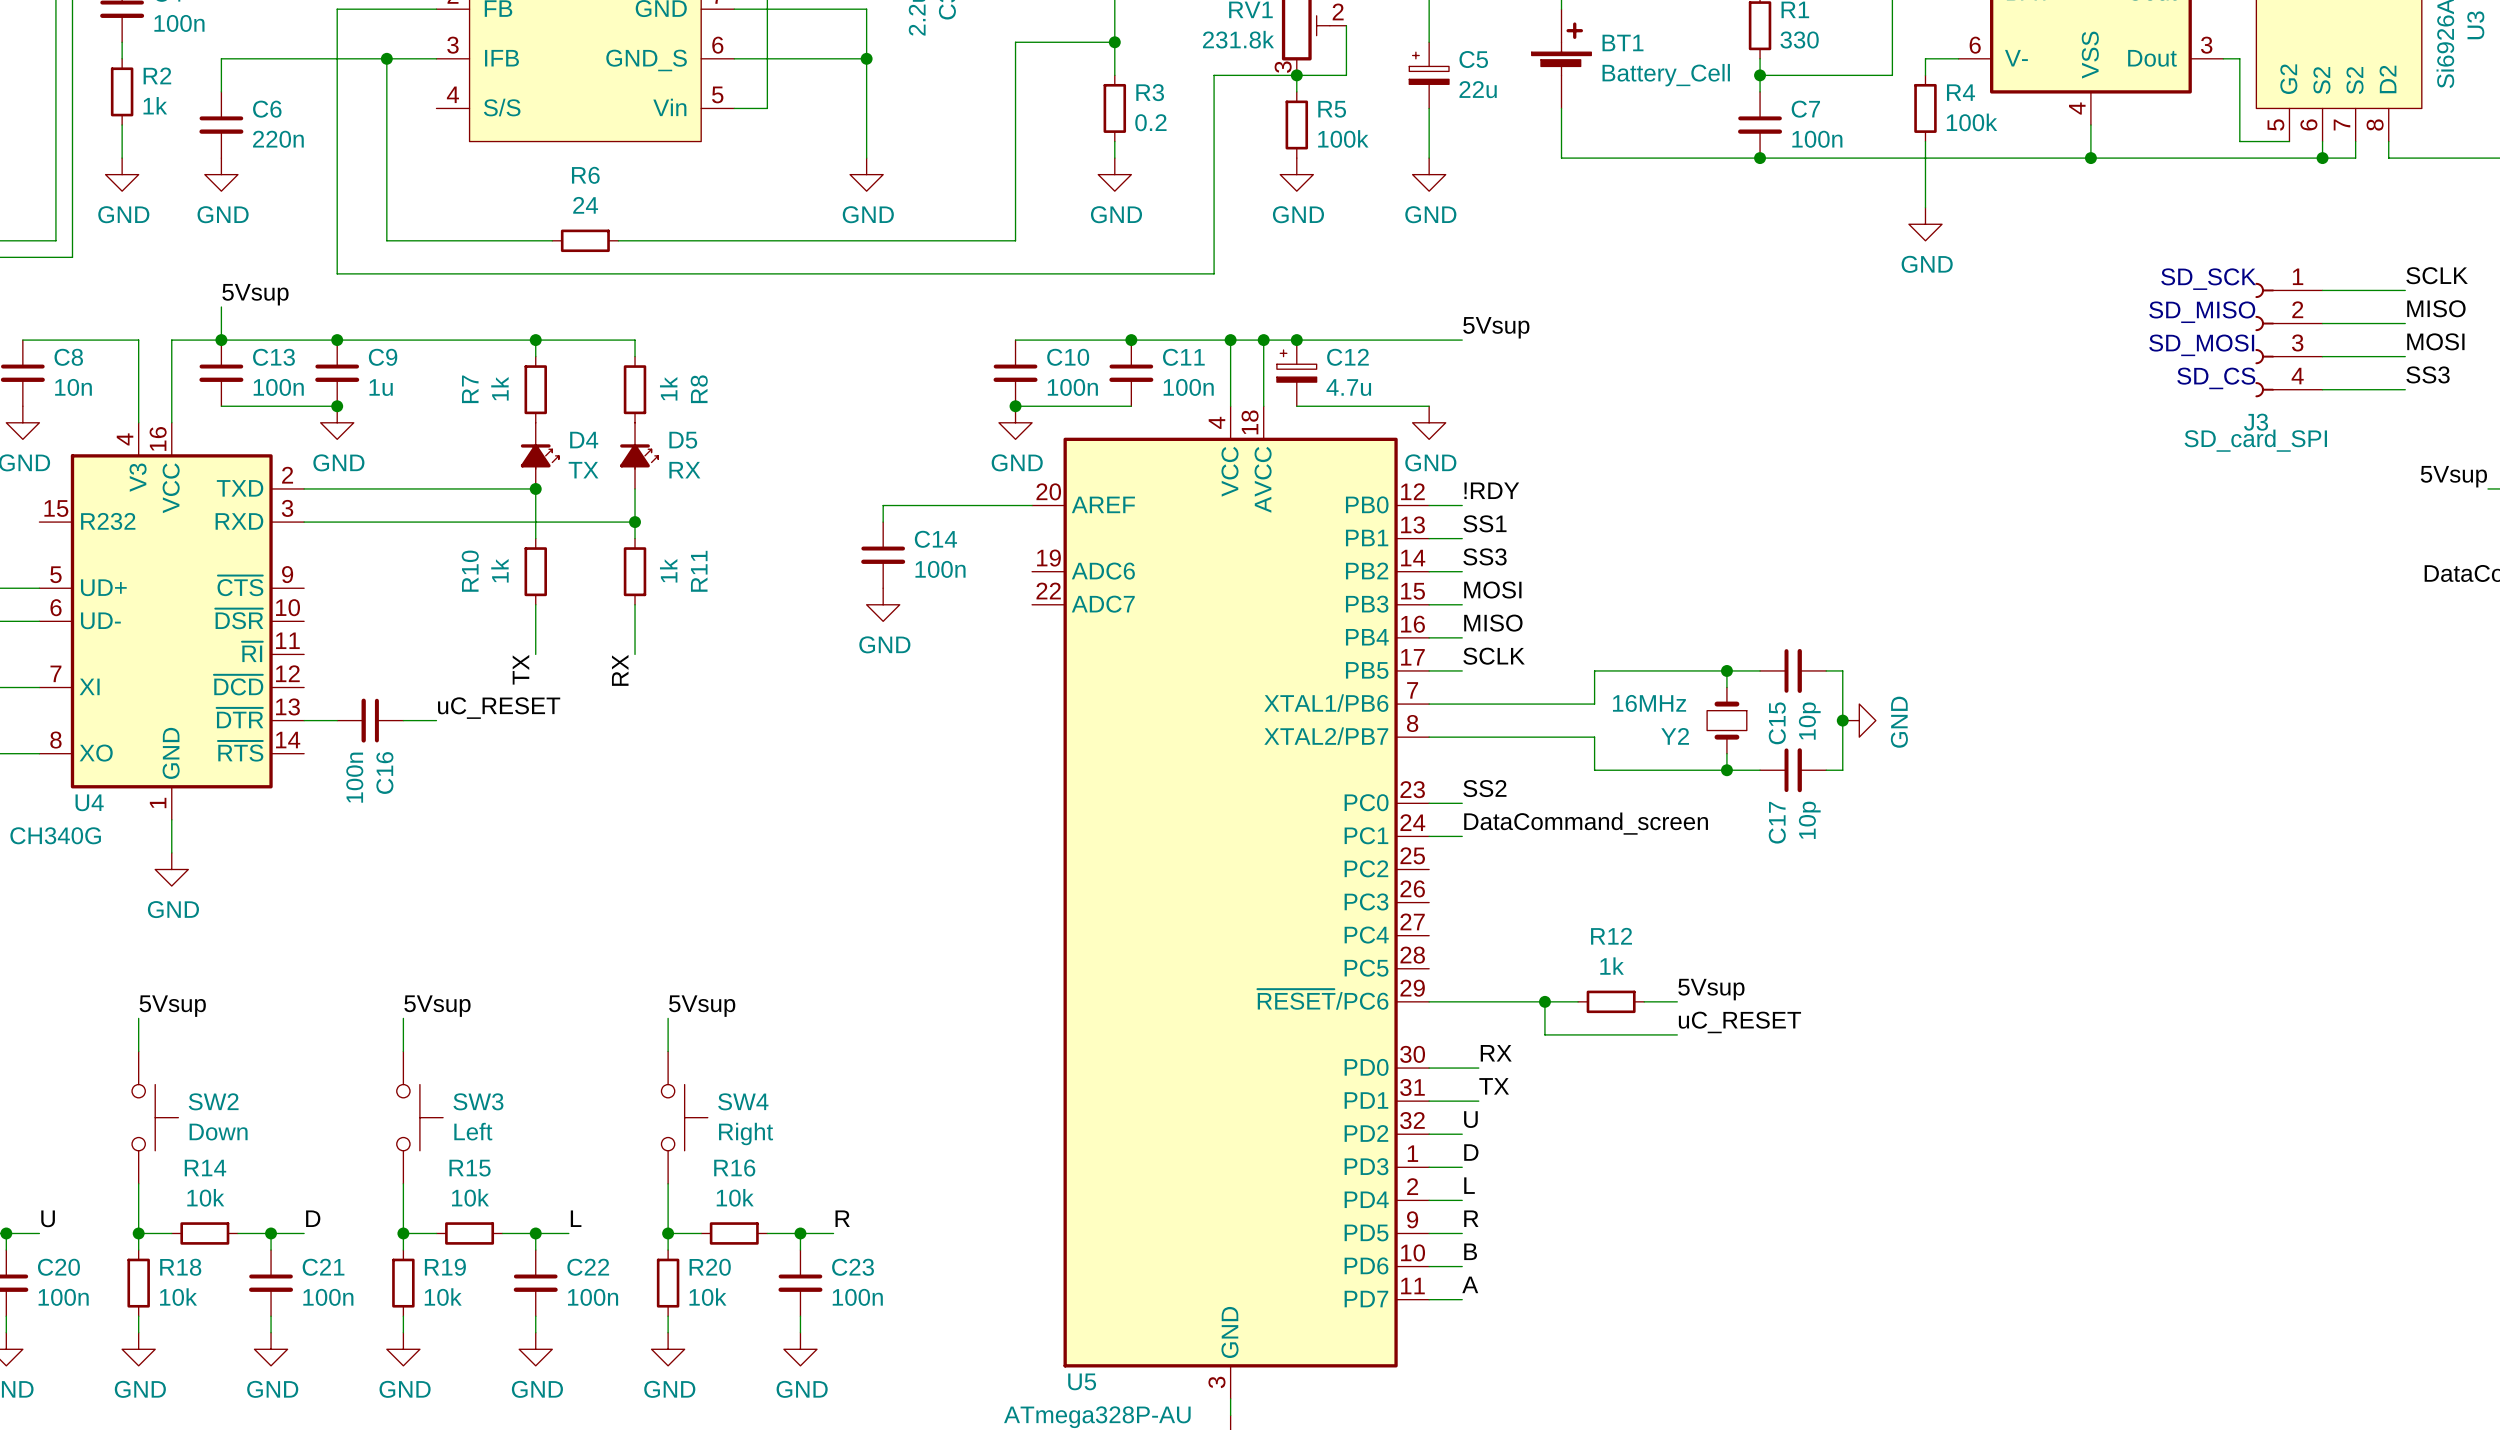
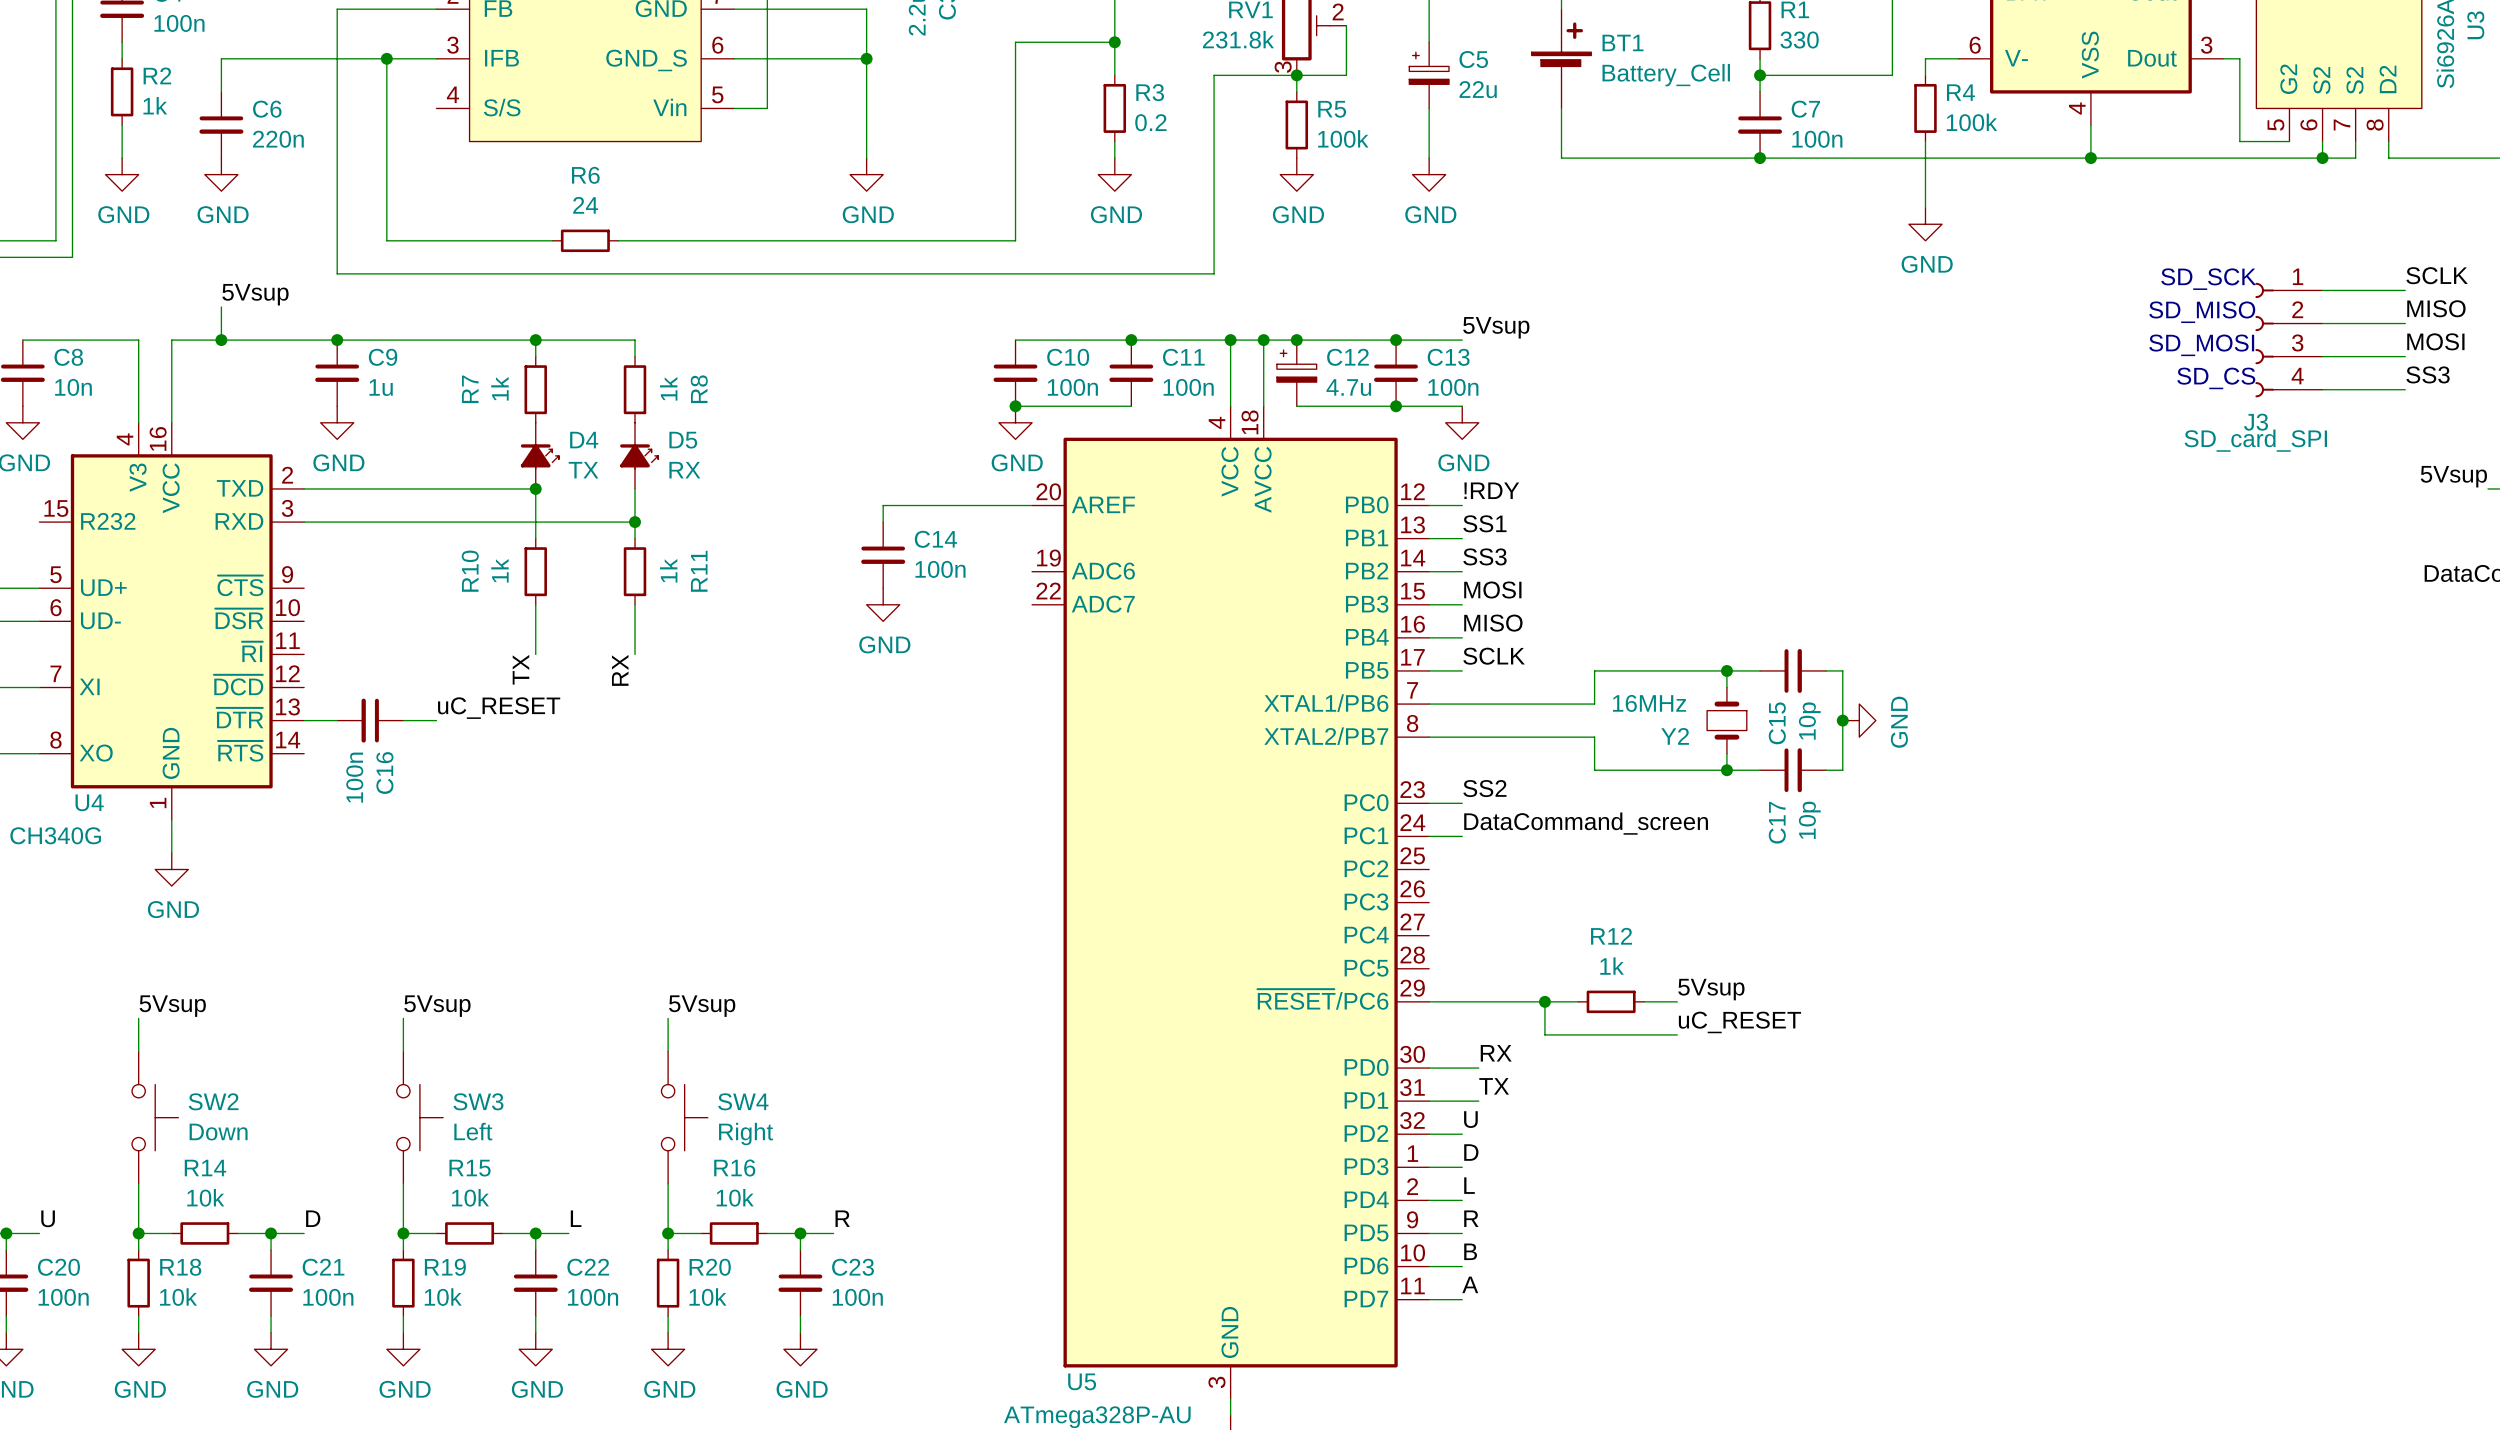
junction: none -> (1396, 340)
C13 position: (221, 373) -> (1396, 373)
wire: (221, 406) (337, 406) -> none
junction: (337, 406) -> none
junction: none -> (1396, 406)
wire: none -> (1429, 406) (1462, 406)
power symbol position: GND (1429, 422) -> GND (1462, 422)

